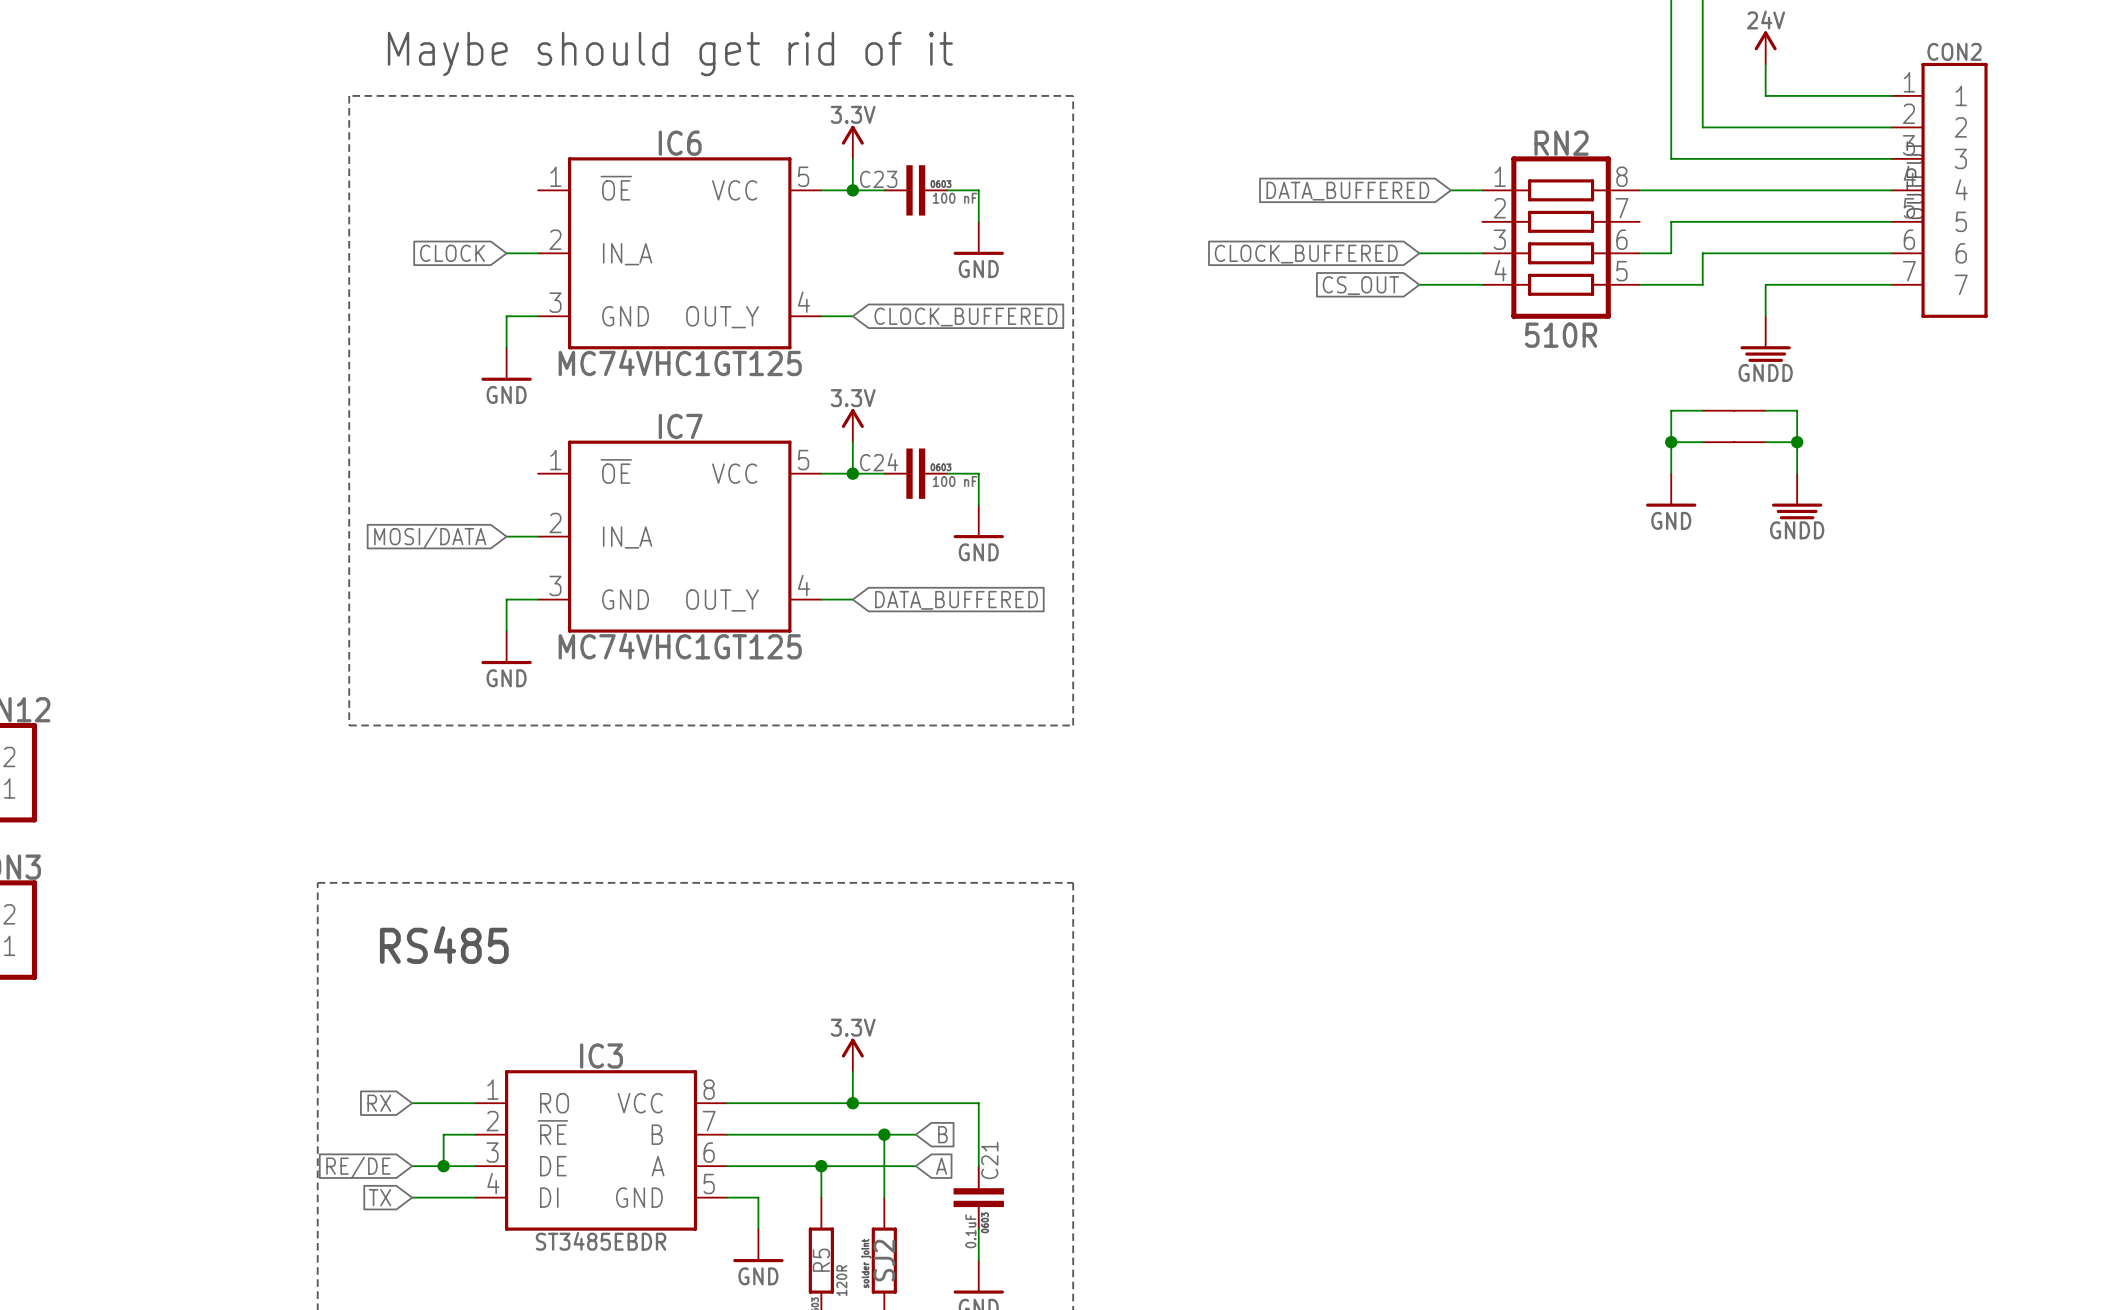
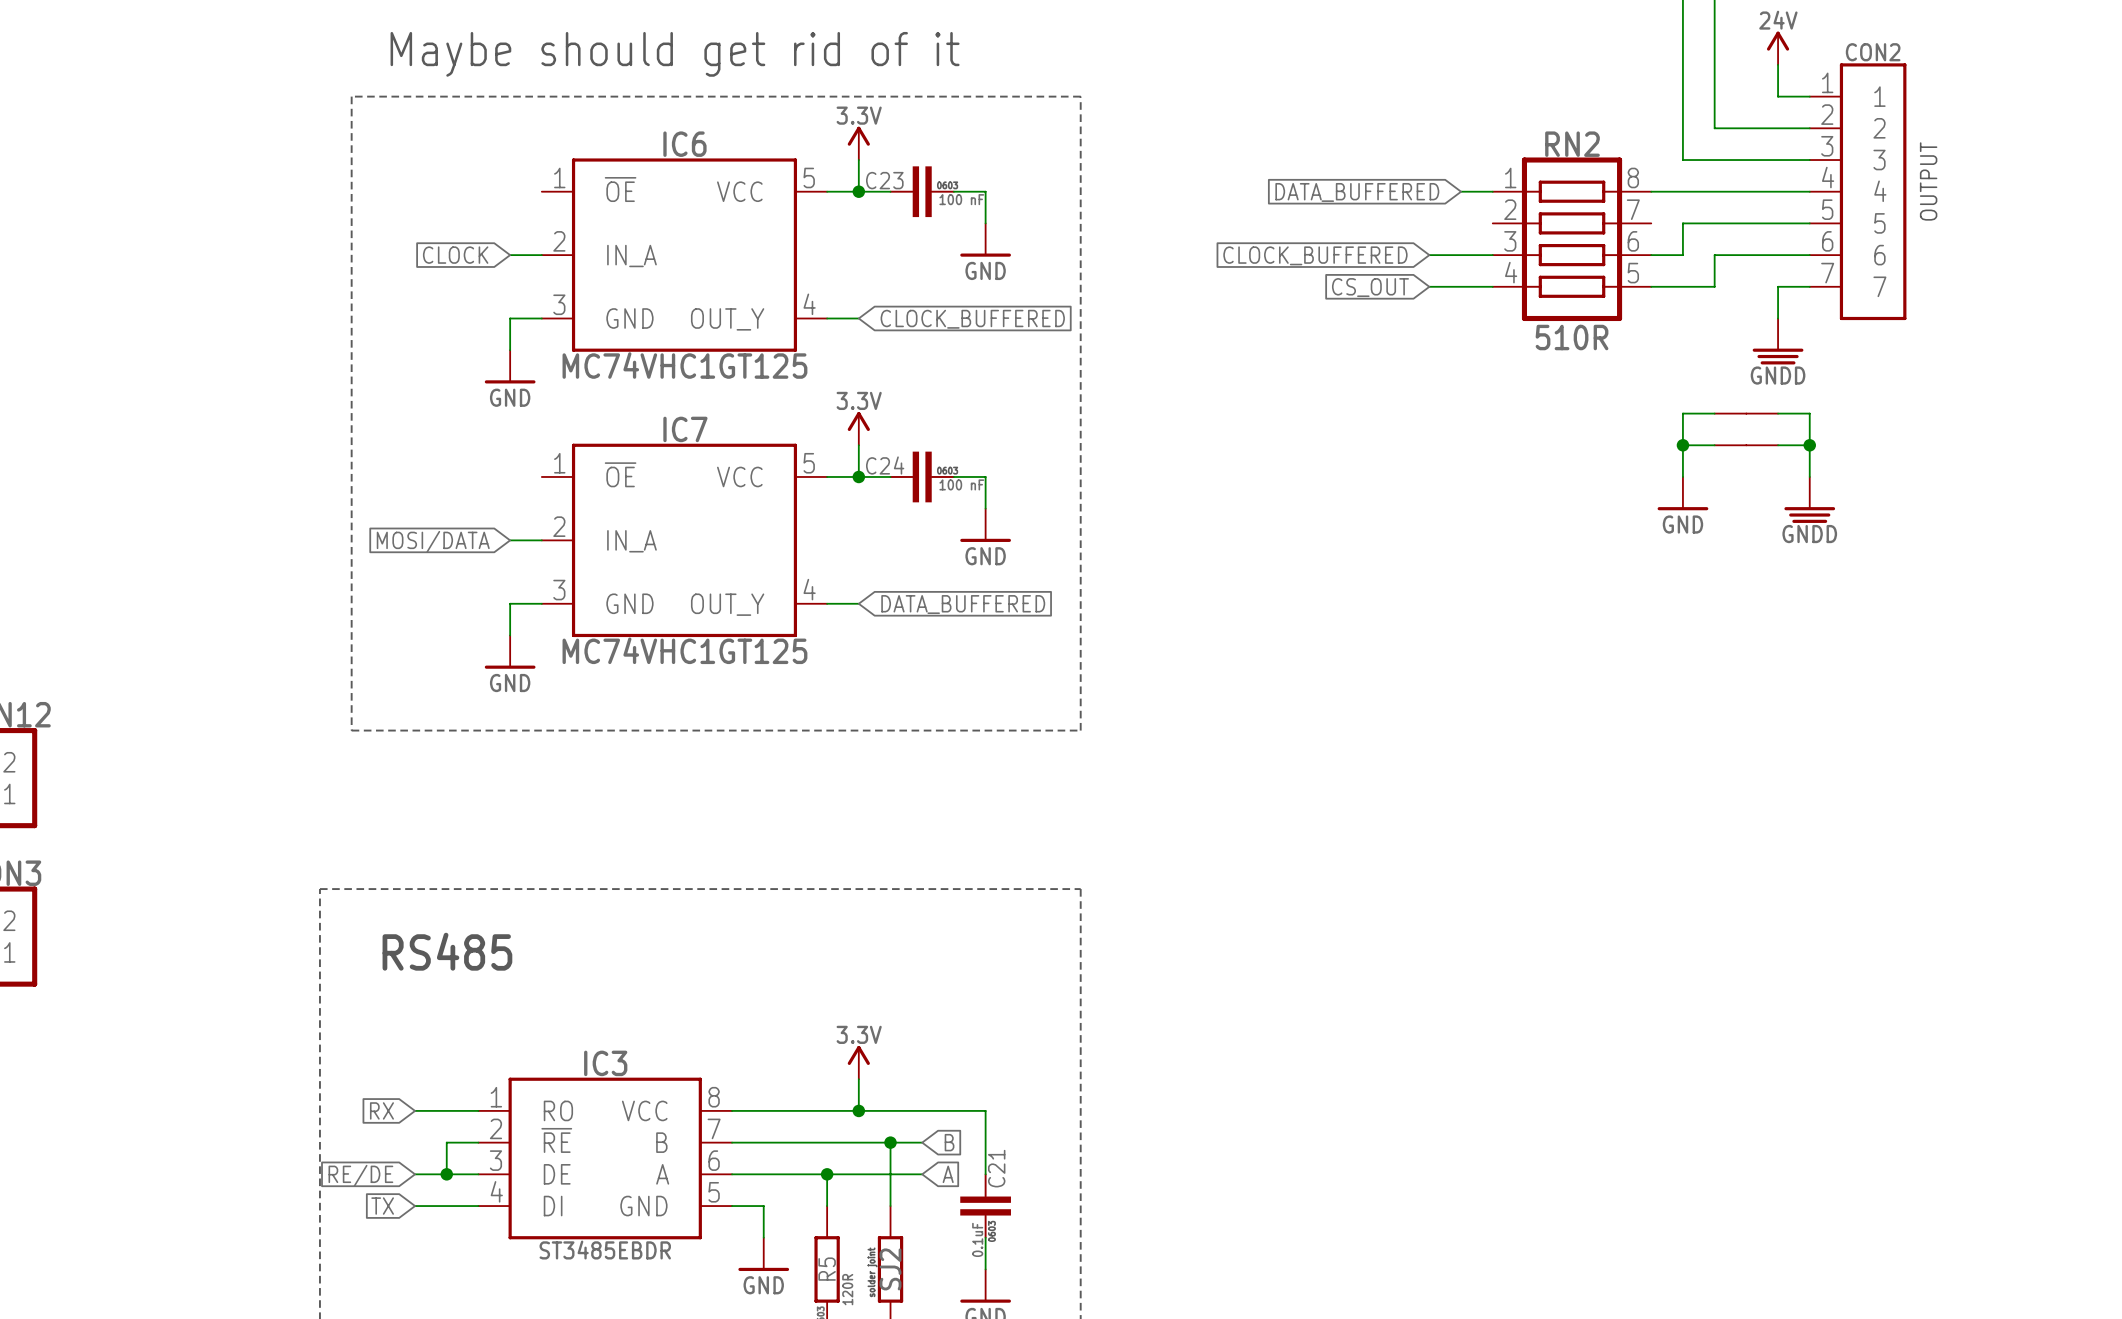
wire: (1797, 95) (1891, 95) -> none
wire: (1797, 127) (1891, 127) -> none
wire: (1797, 158) (1891, 158) -> none
wire: (1797, 190) (1891, 190) -> none
CON2 position: (1939, 190) -> (1858, 191)
wire: (1797, 221) (1891, 221) -> none
wire: (1797, 253) (1891, 253) -> none
wire: (1797, 284) (1891, 284) -> none

